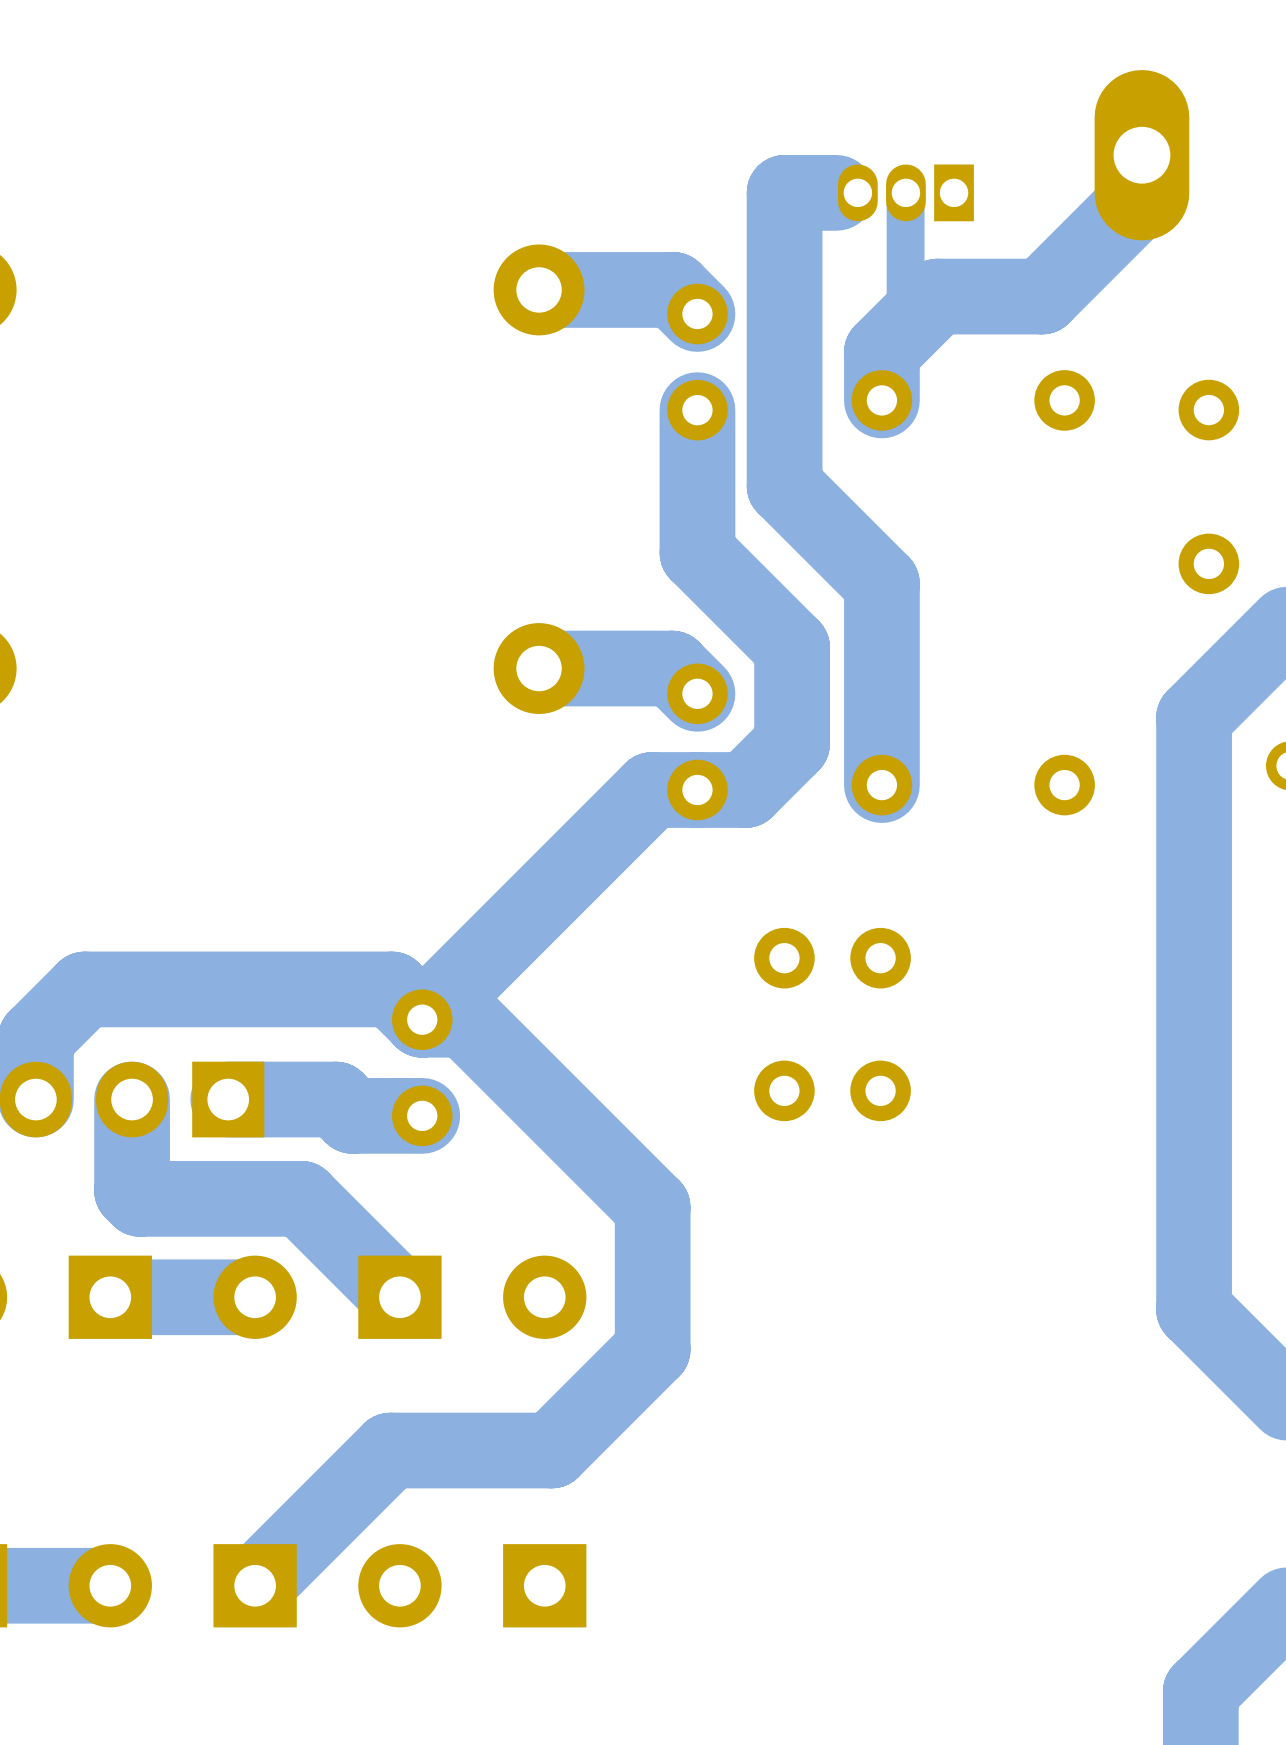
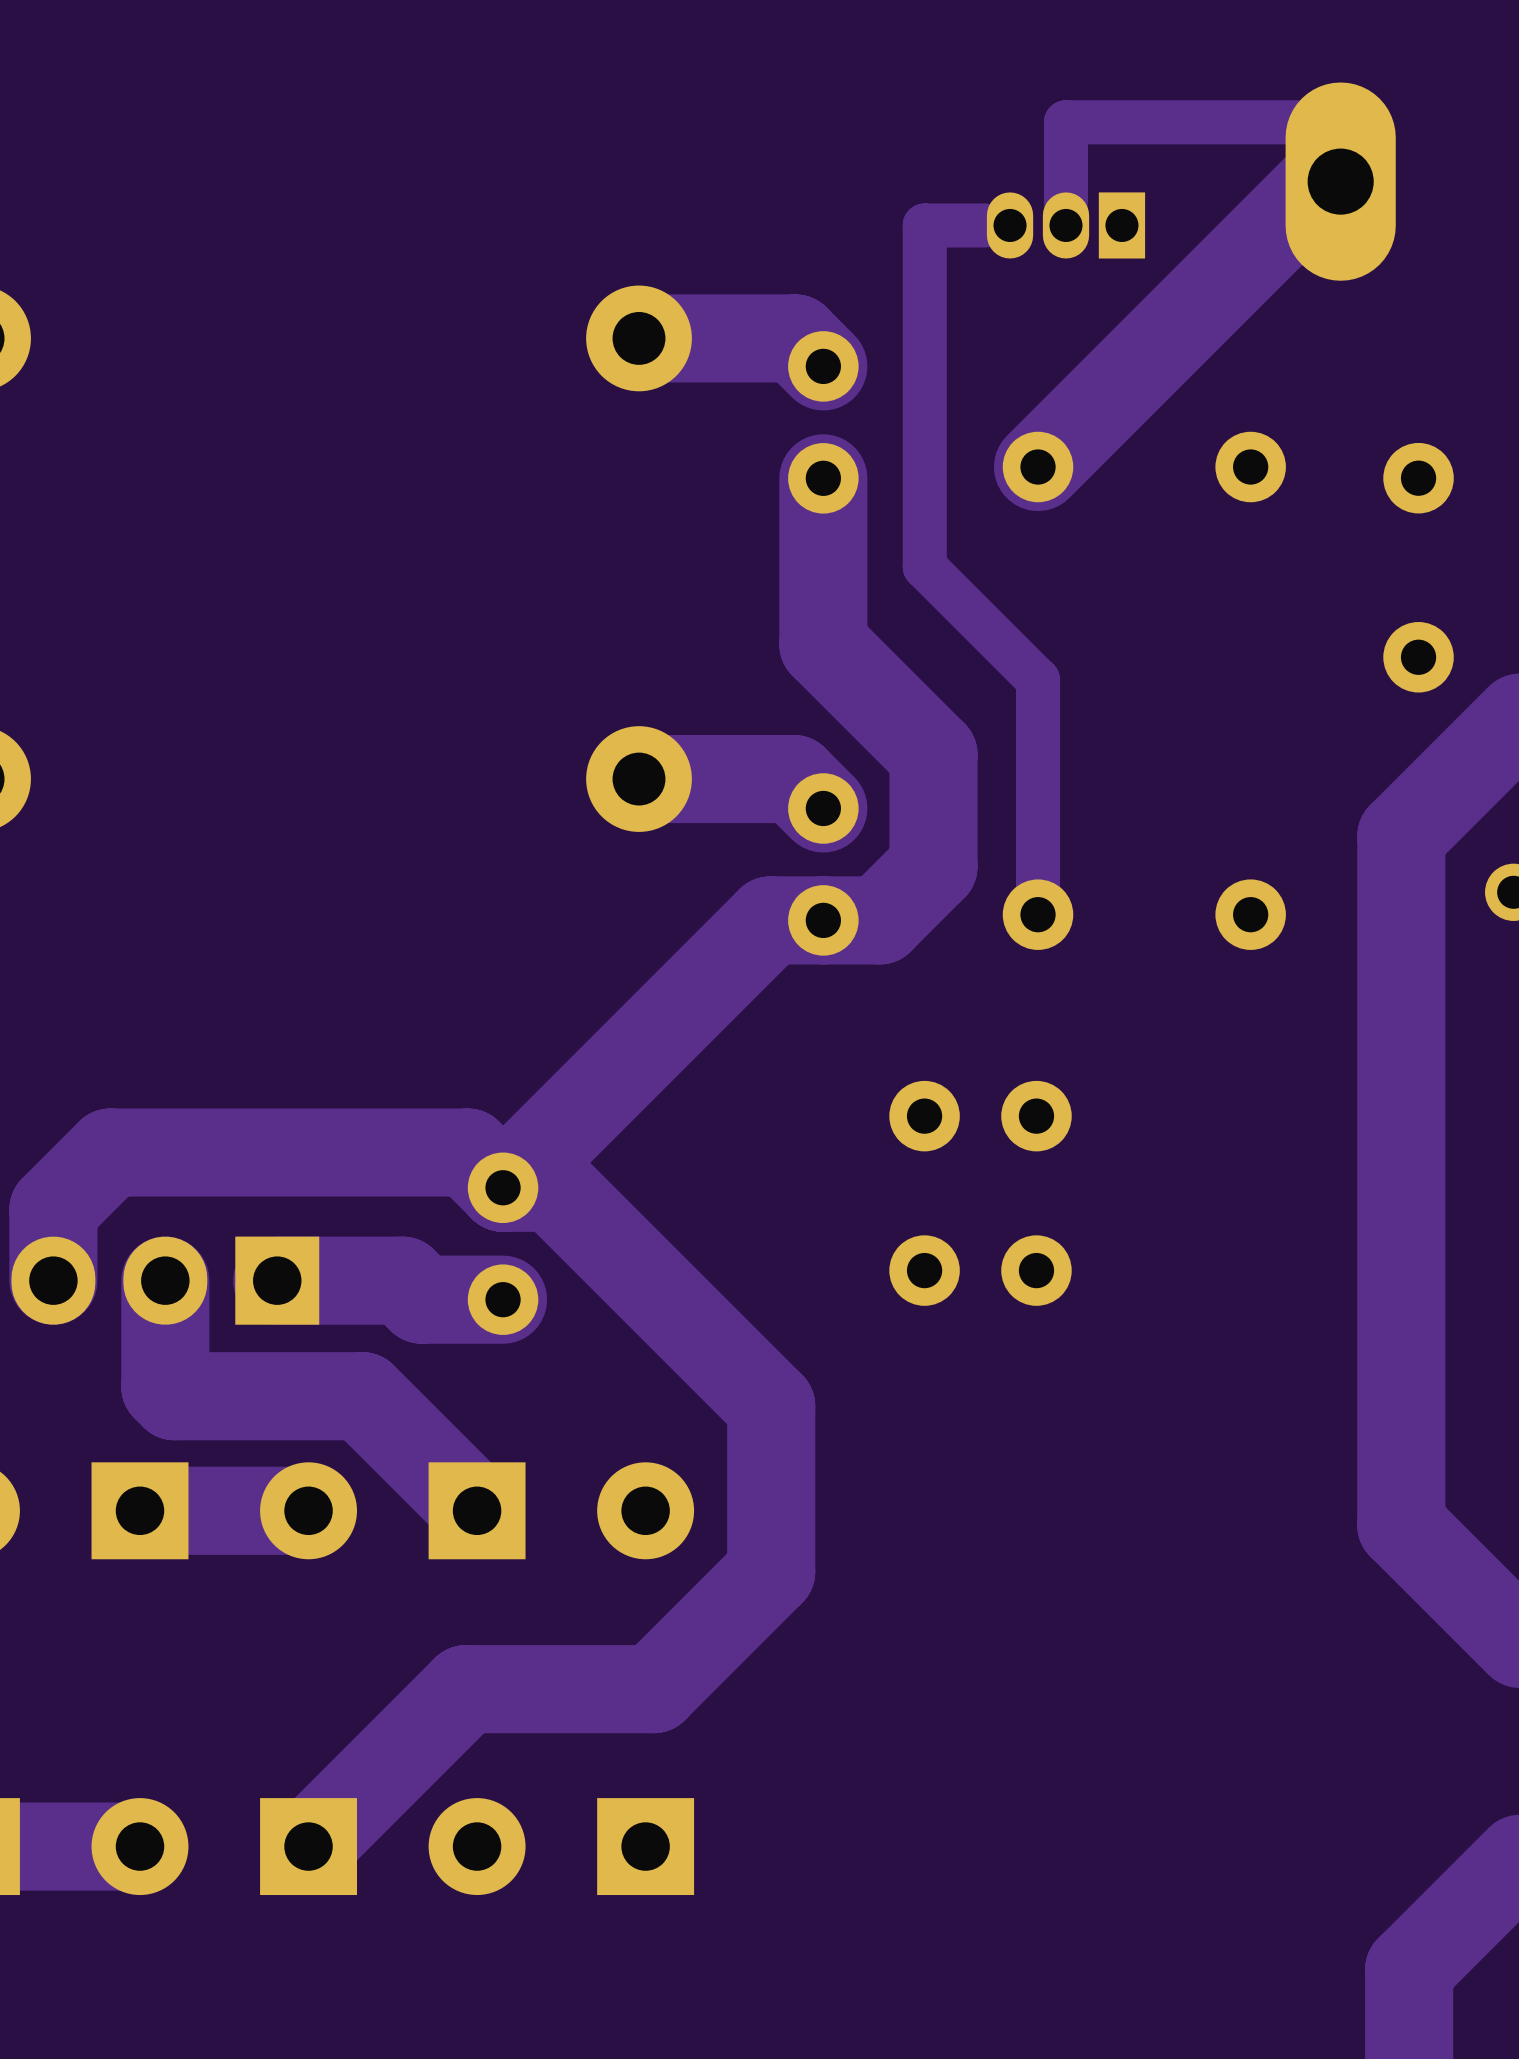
track: none -> (1340, 122) (1065, 122) (1065, 201)
track width: thick (836, 192) (784, 192) (784, 486) (881, 583) (881, 785) -> thin (985, 225) (924, 225) (924, 566) (1038, 680) (1038, 914)
track: (905, 192) (905, 308) -> none
track: (1141, 196) (1042, 296) (937, 296) (881, 352) (881, 400) -> (1340, 181) (1323, 181) (1038, 467)

